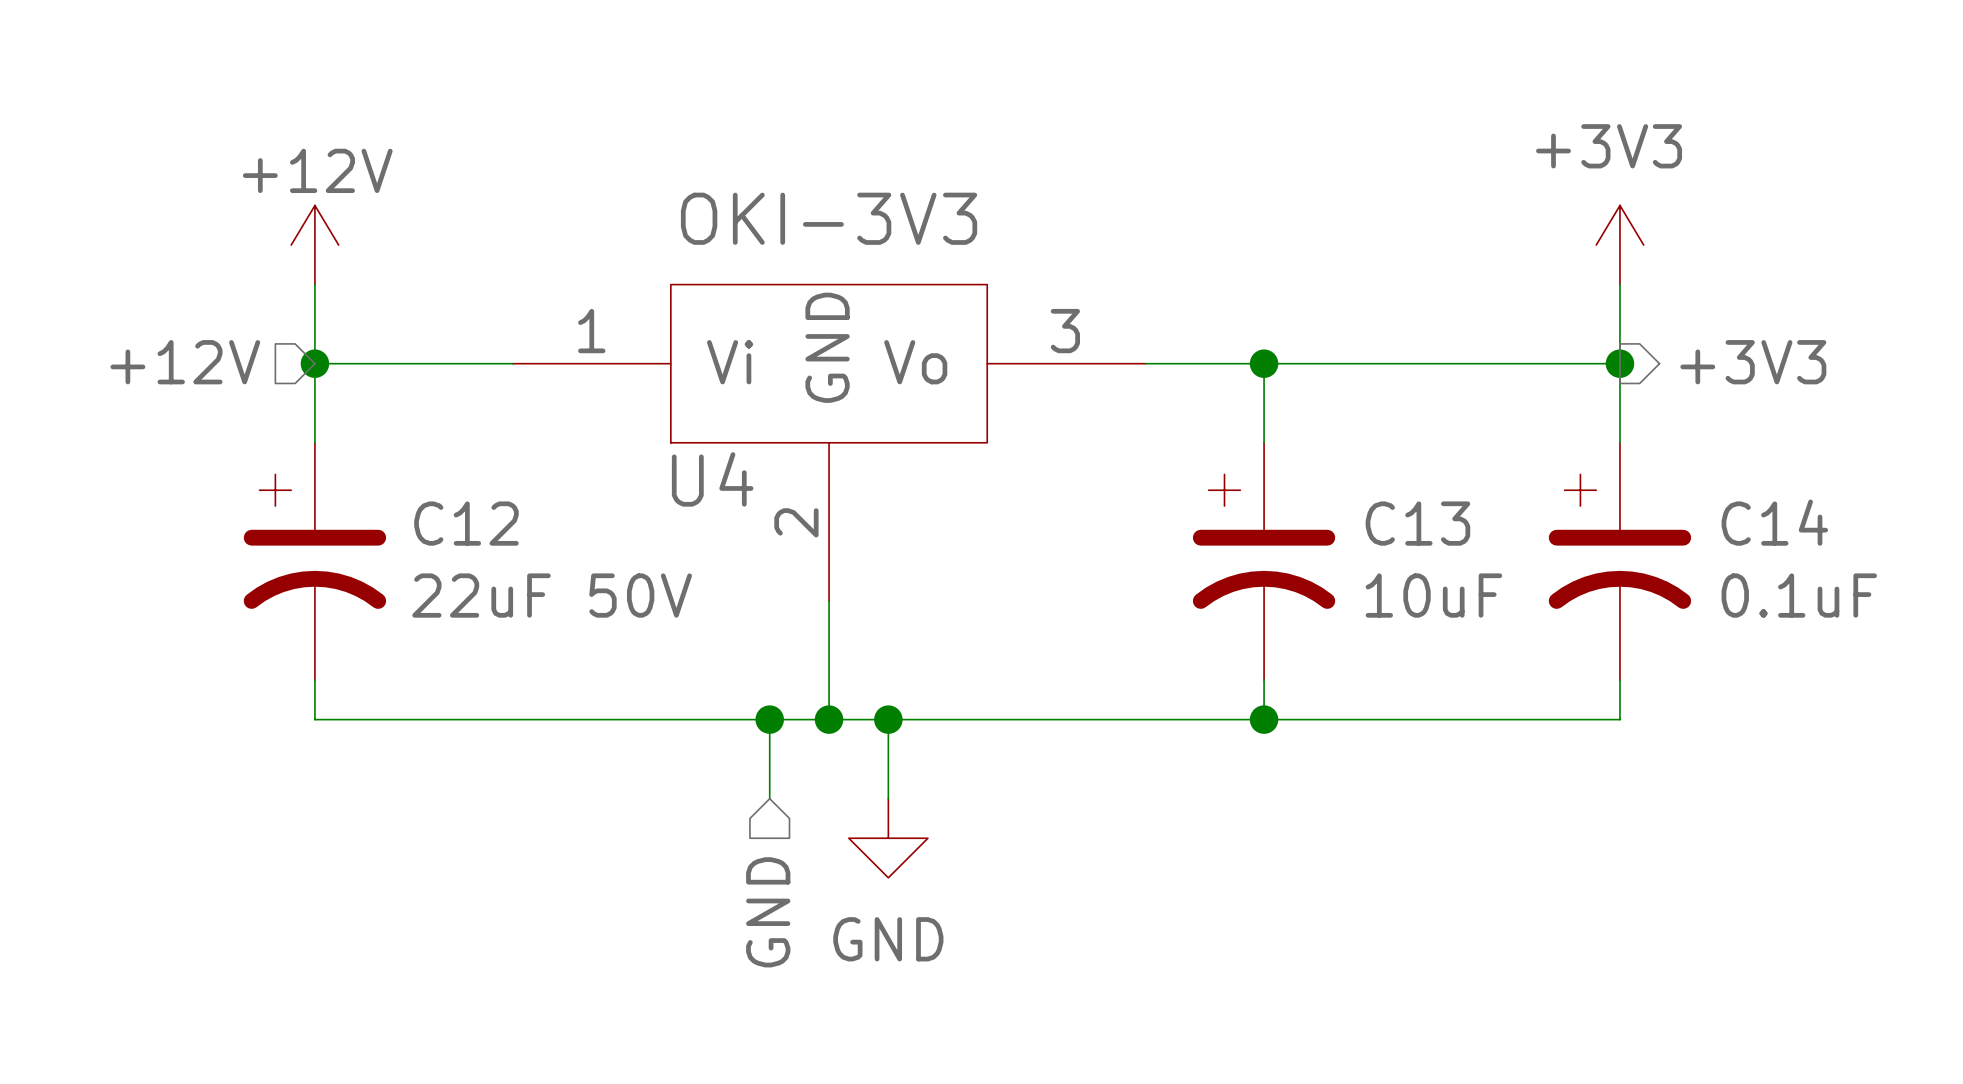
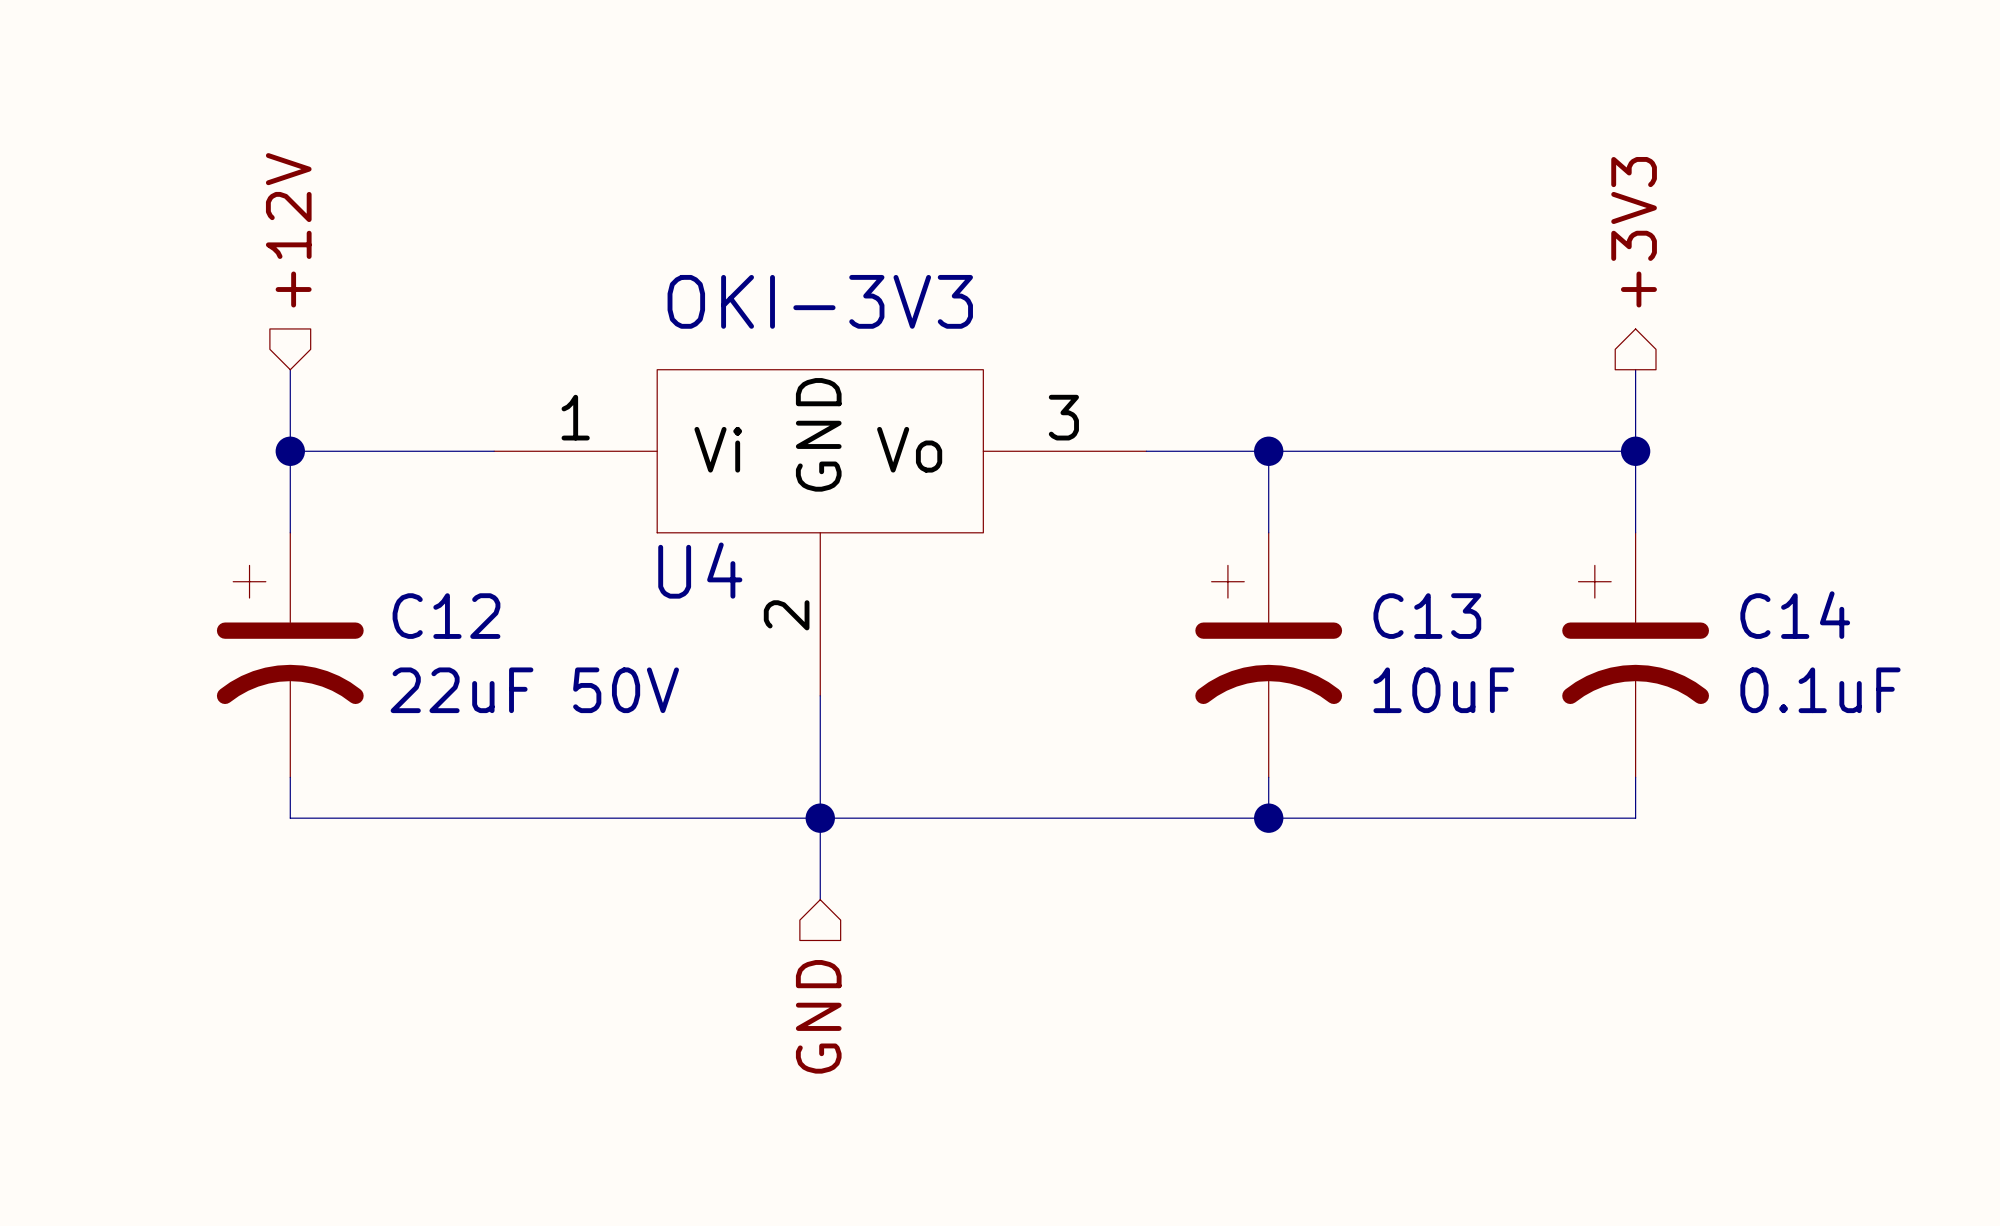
power symbol: +12V (314, 245) -> none
power symbol: +3V3 (1619, 245) -> none
hierarchical label rotation: 0° (185, 362) -> 90° clockwise (288, 230)
hierarchical label position: +12V (185, 362) -> +12V (288, 230)
hierarchical label rotation: 0° (1753, 362) -> 90° counterclockwise (1634, 232)
hierarchical label position: +3V3 (1753, 362) -> +3V3 (1634, 232)
wire: (769, 719) (769, 798) -> (820, 818) (820, 899)
junction: (769, 719) -> none
wire: (888, 719) (888, 798) -> none
junction: (888, 719) -> none
power symbol: GND (888, 838) -> none
hierarchical label position: GND (768, 912) -> GND (818, 1016)

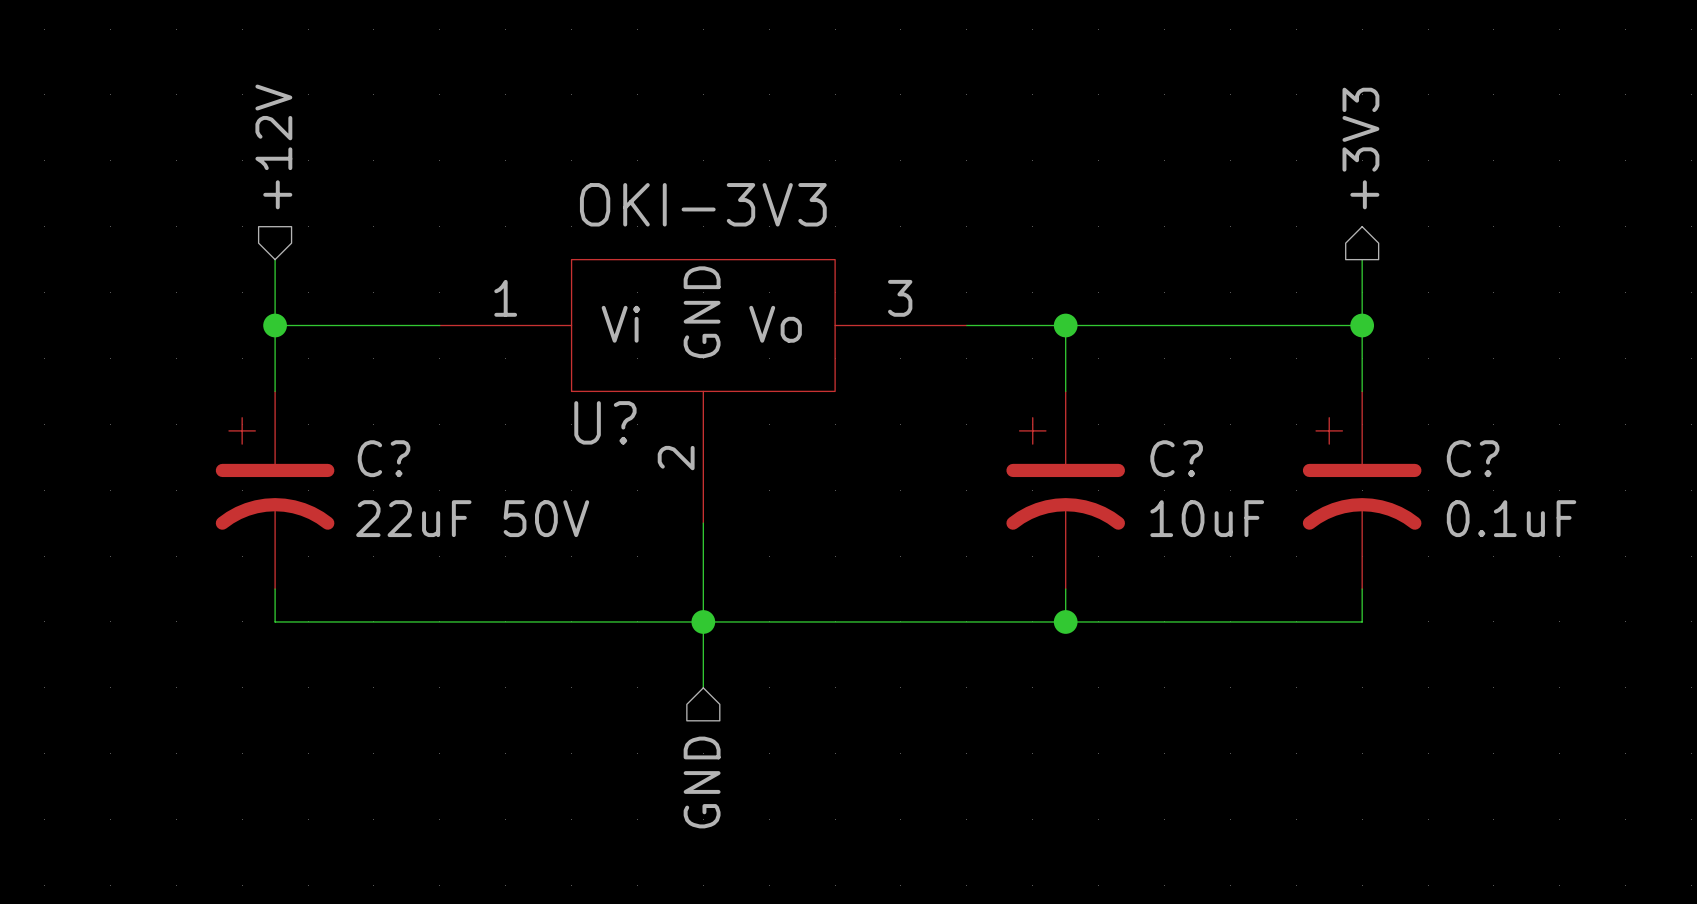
U4 name: U4 (700, 570) -> U? (605, 422)
C14 name: C14 (1795, 615) -> C? (1473, 458)
C12 name: C12 (446, 616) -> C? (384, 458)
C13 name: C13 (1427, 616) -> C? (1176, 458)

